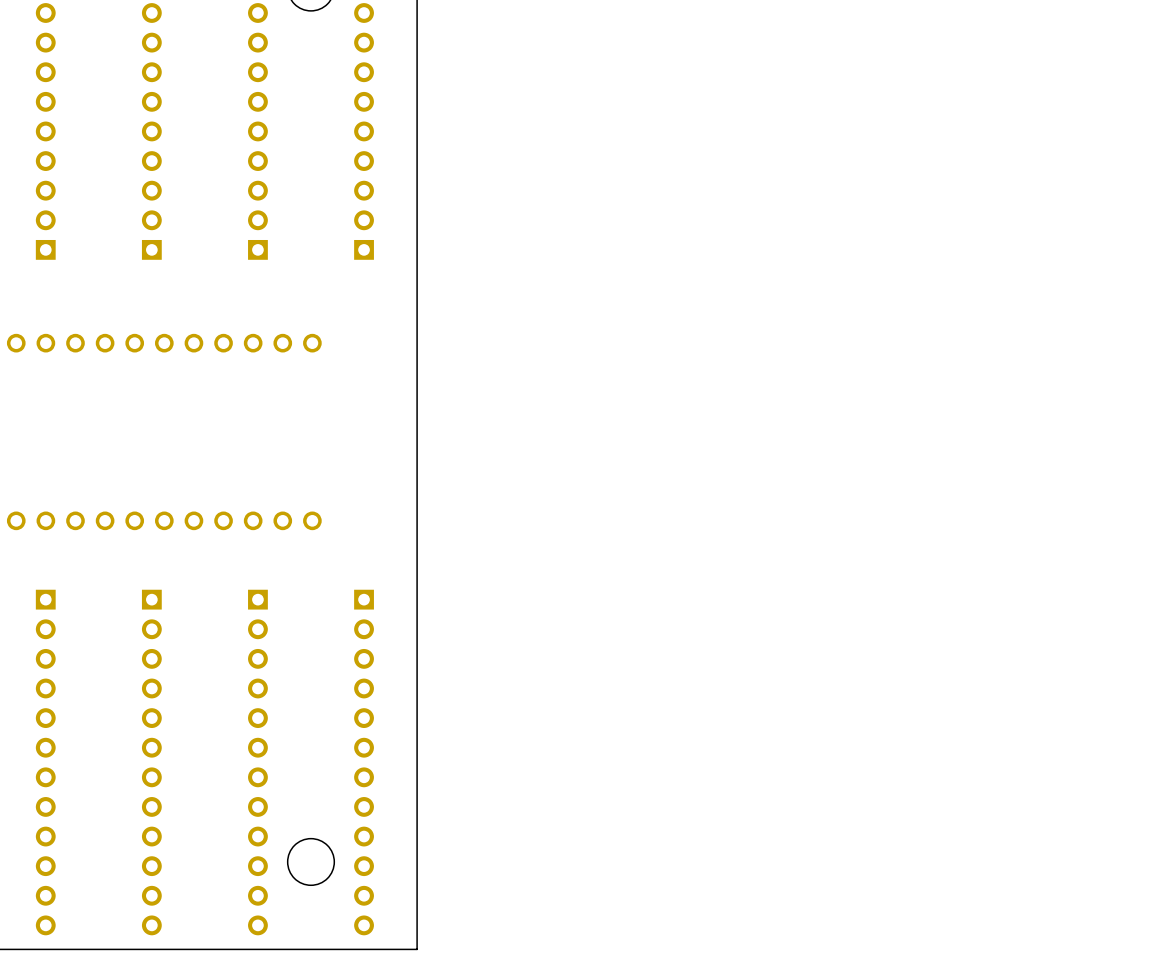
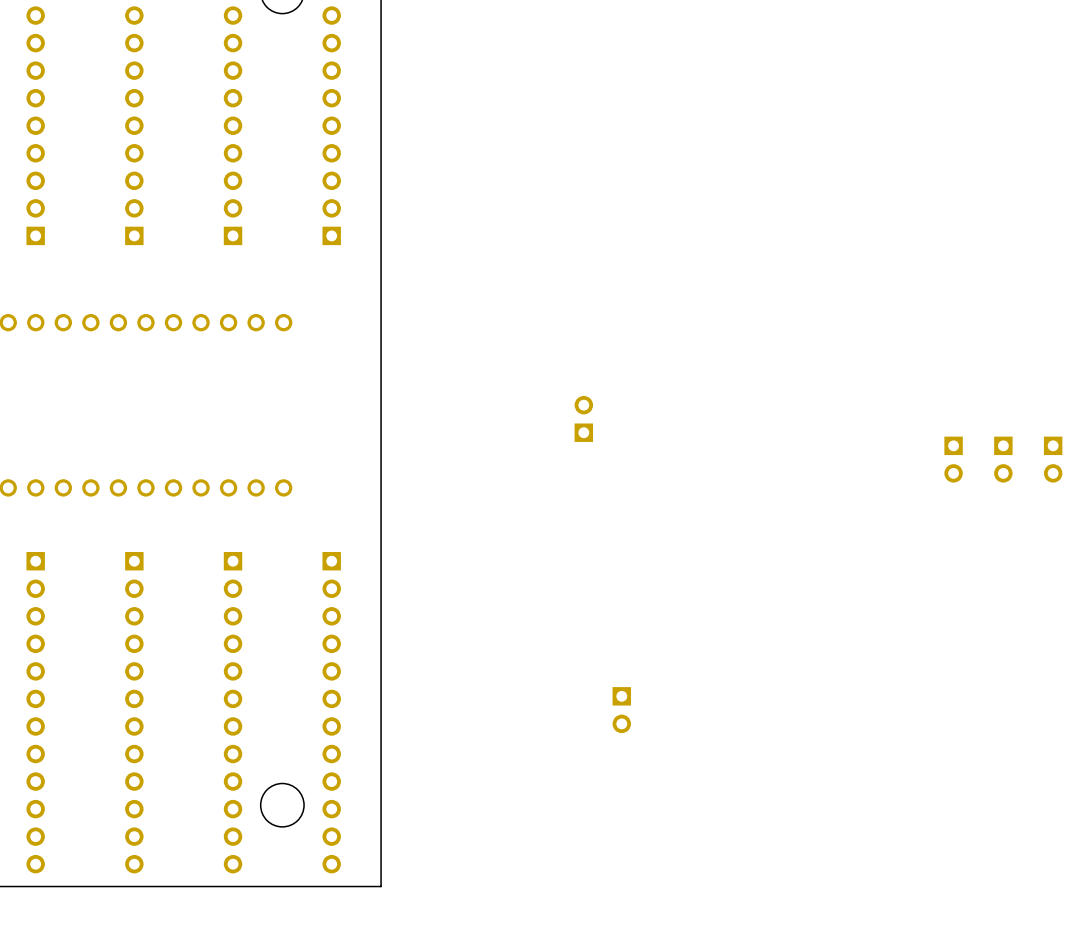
part: none -> (583, 418)
part: none -> (953, 459)
part: none -> (1003, 459)
part: none -> (1053, 459)
part: none -> (621, 710)

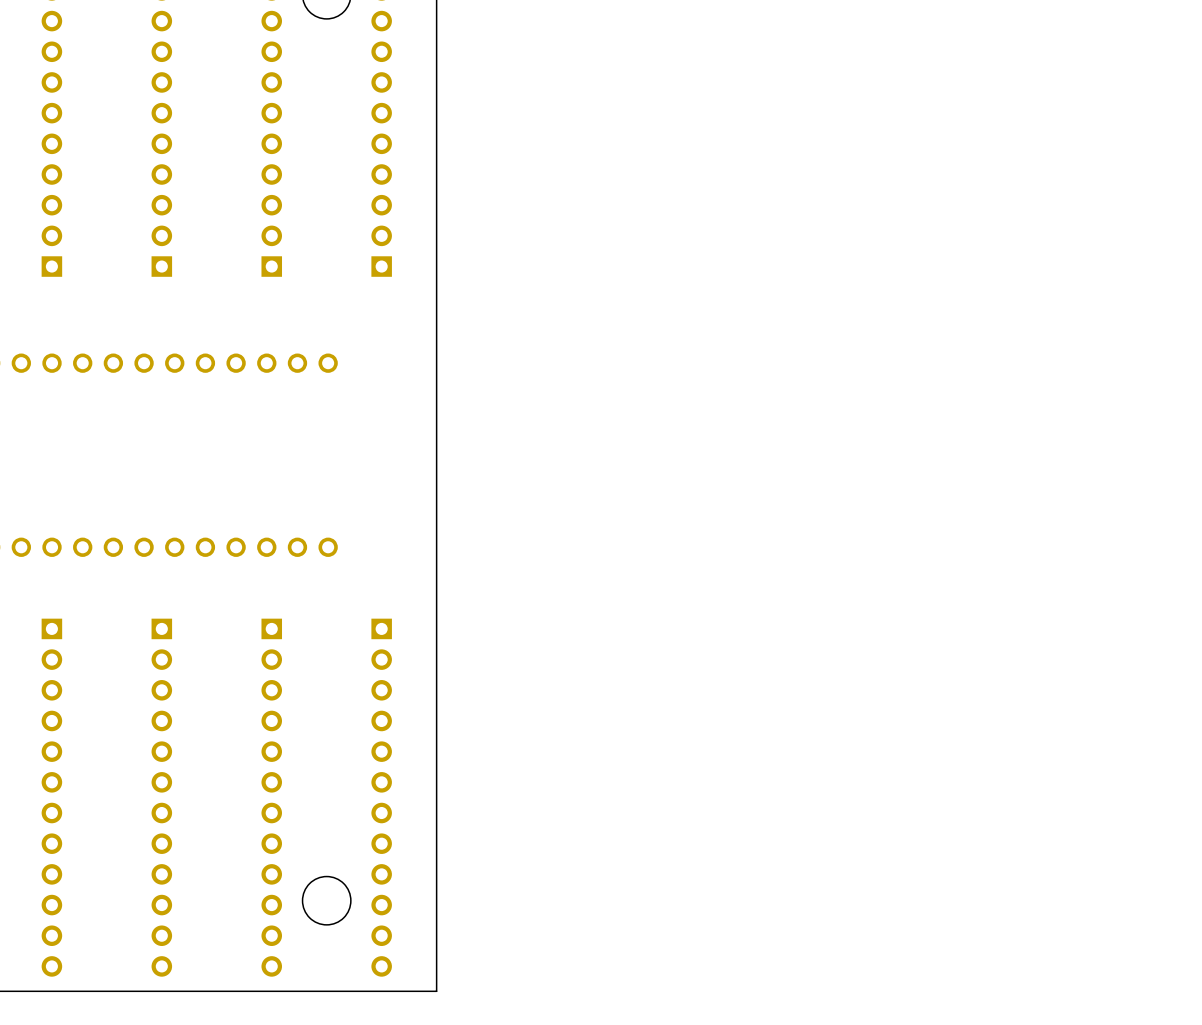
part: (583, 418) -> none
part: (953, 459) -> none
part: (1003, 459) -> none
part: (1053, 459) -> none
part: (621, 710) -> none

